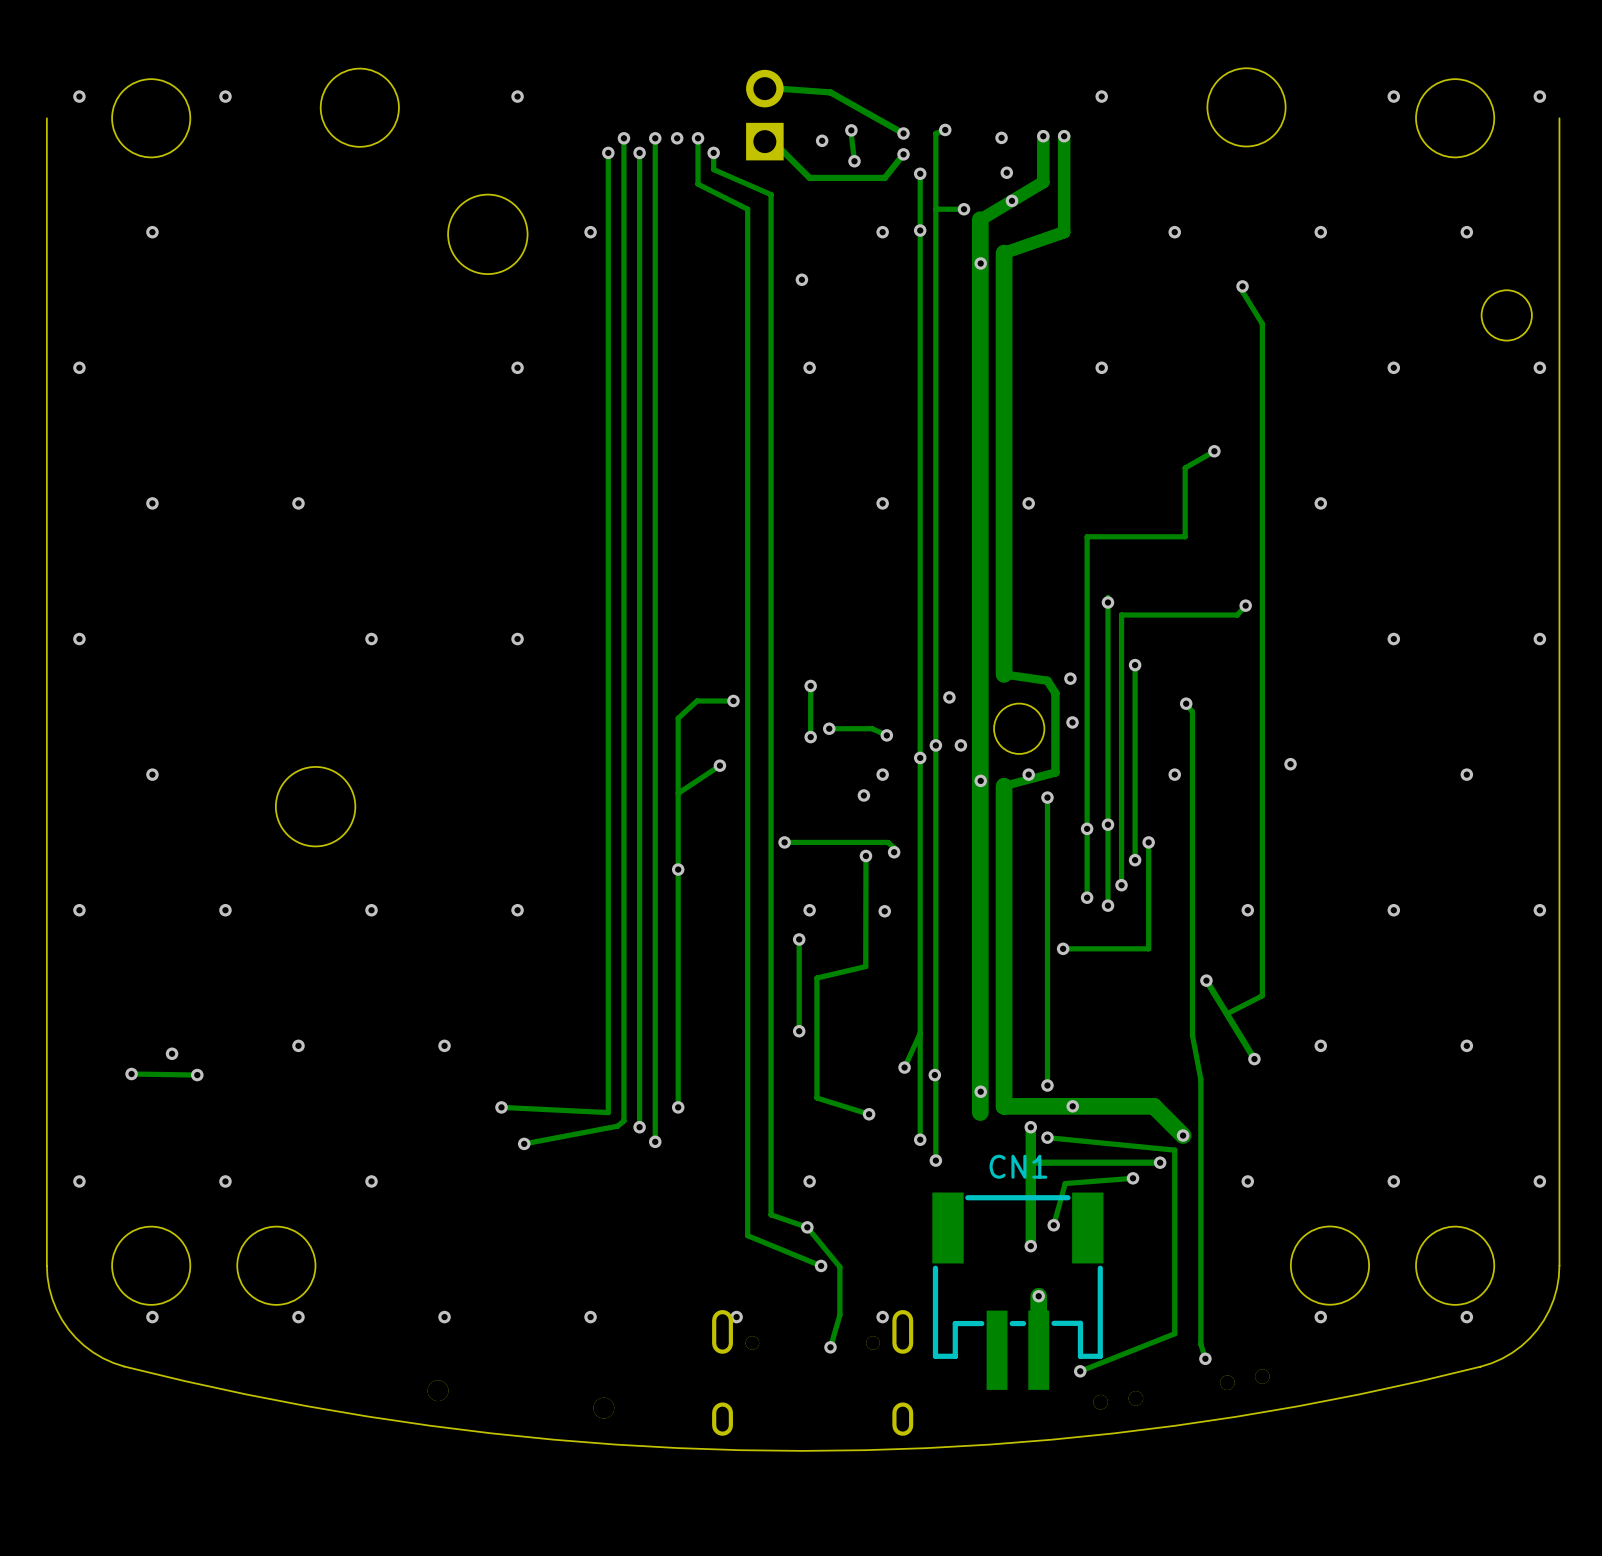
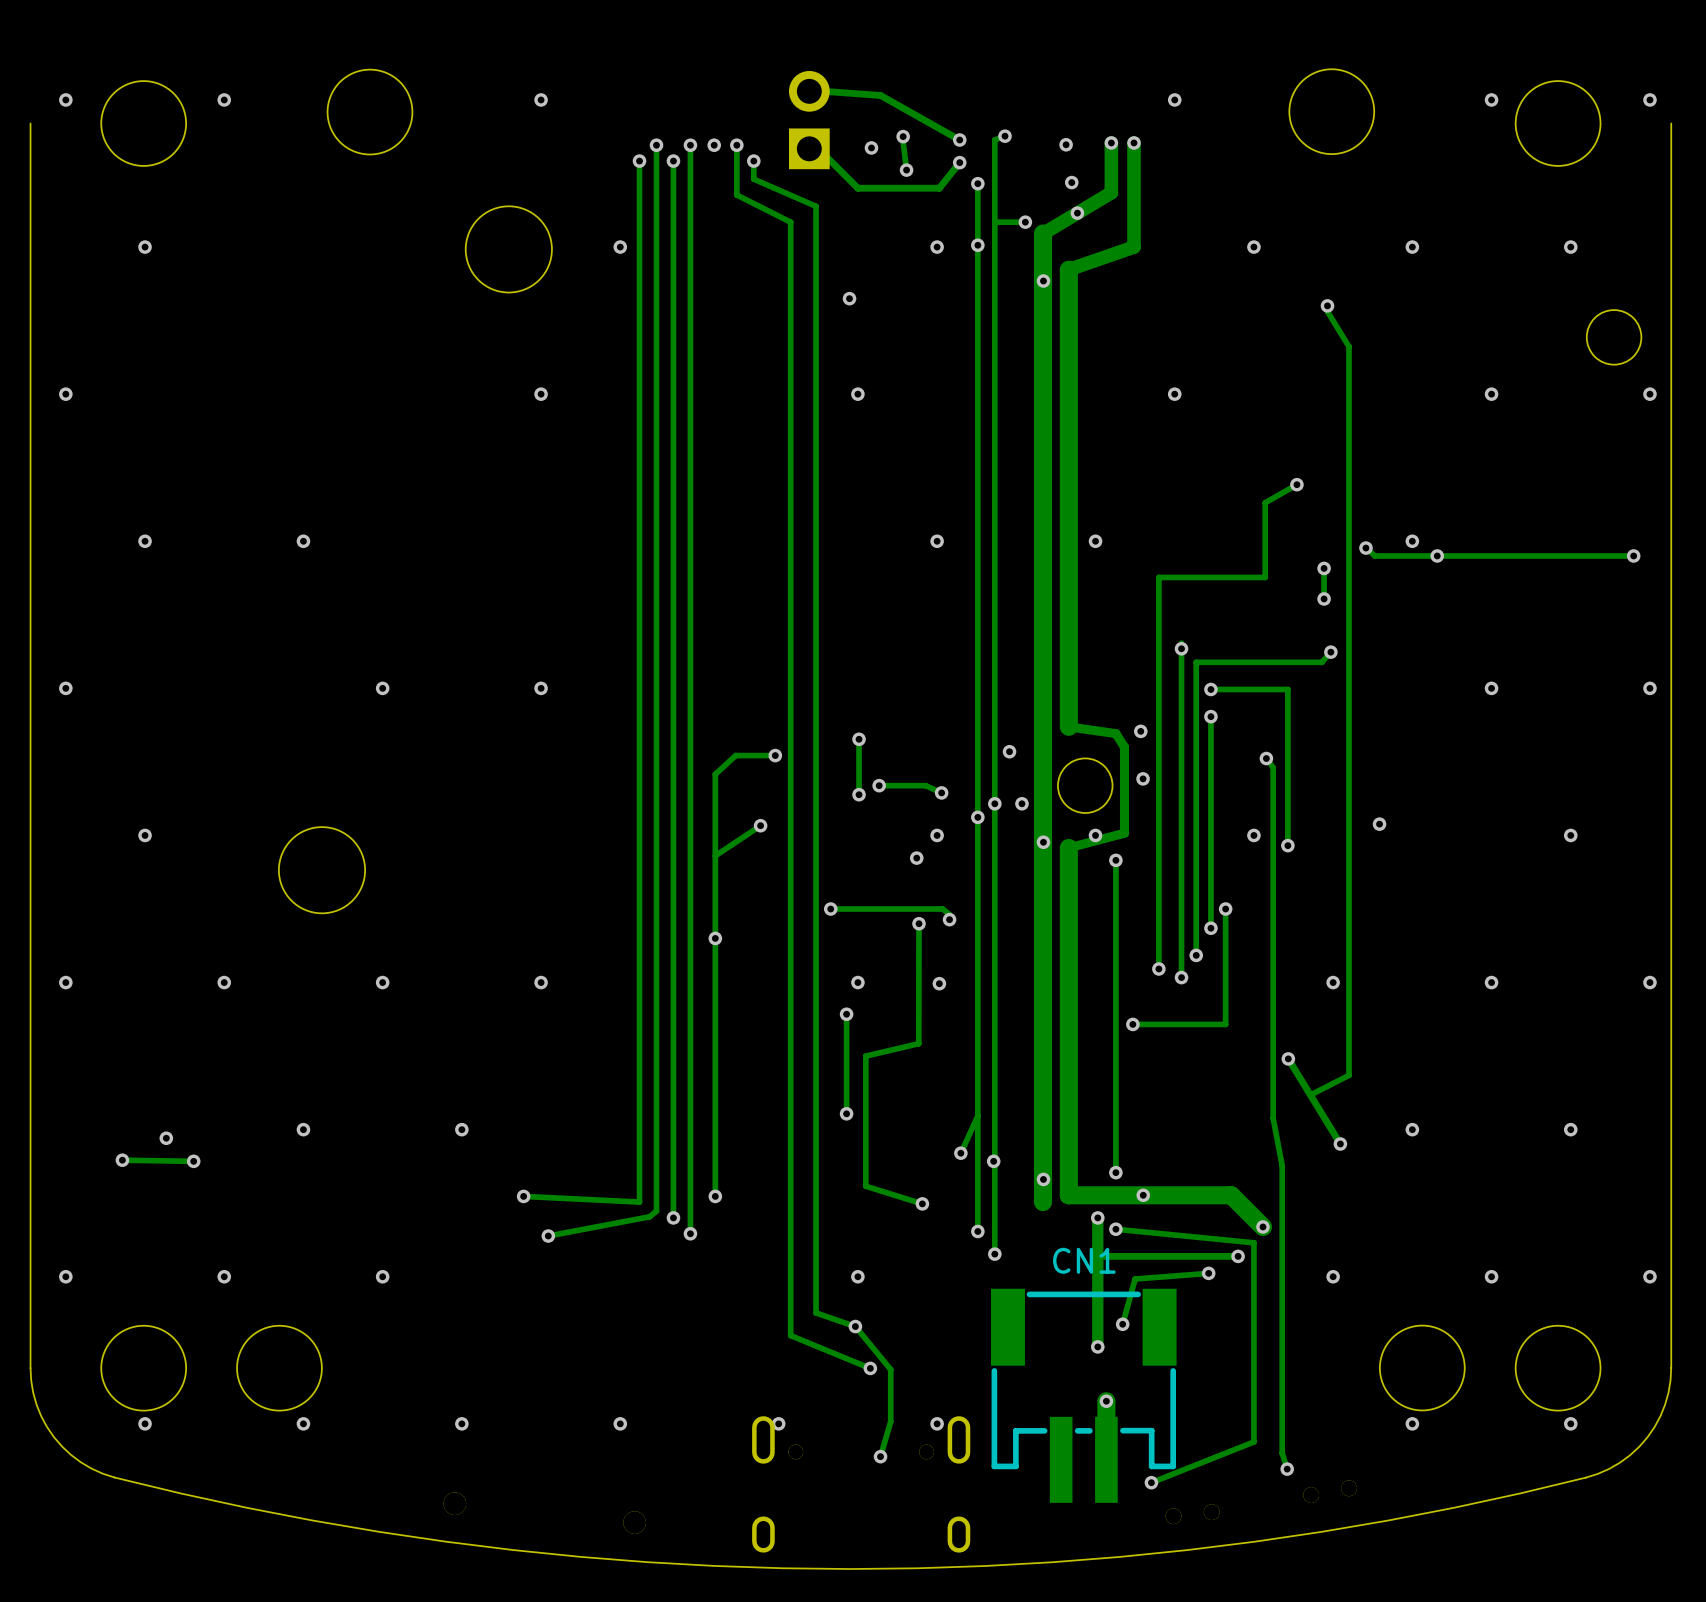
track: none -> (1365, 548) (1375, 555) (1633, 555)
via: none -> (1365, 548)
via: none -> (1437, 555)
via: none -> (1633, 555)
track: none -> (1324, 568) (1324, 598)
via: none -> (1324, 568)
via: none -> (1324, 598)
track: none -> (1210, 689) (1287, 689) (1287, 845)
via: none -> (1210, 689)
via: none -> (1287, 845)
via: (1107, 824) -> none
via: (1087, 828) -> none

